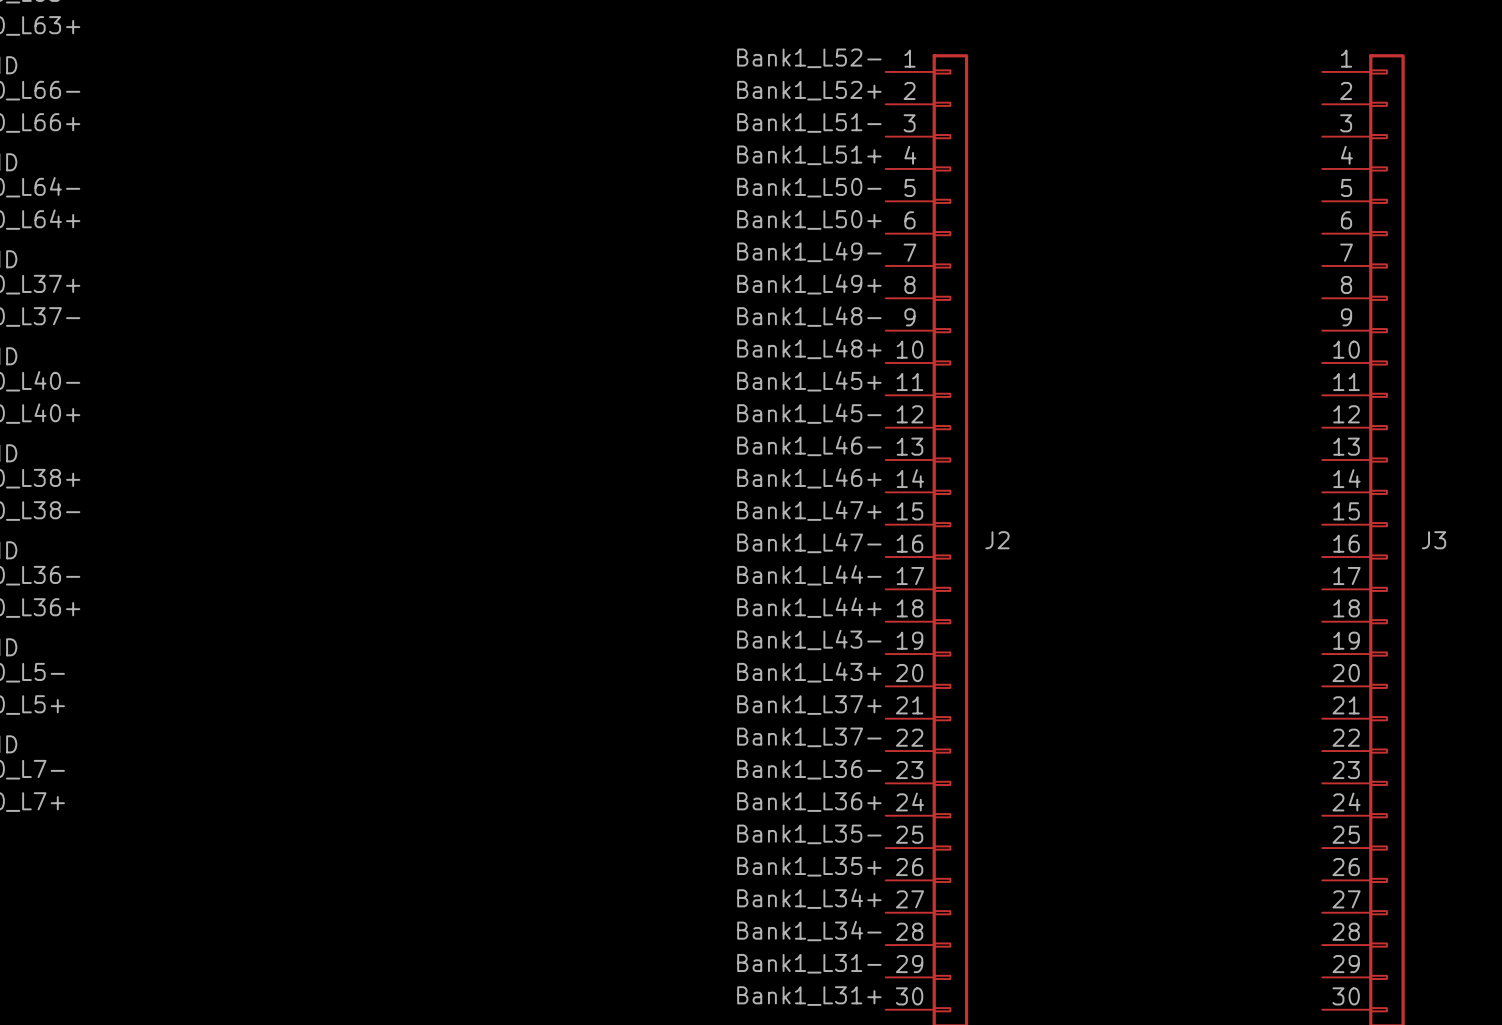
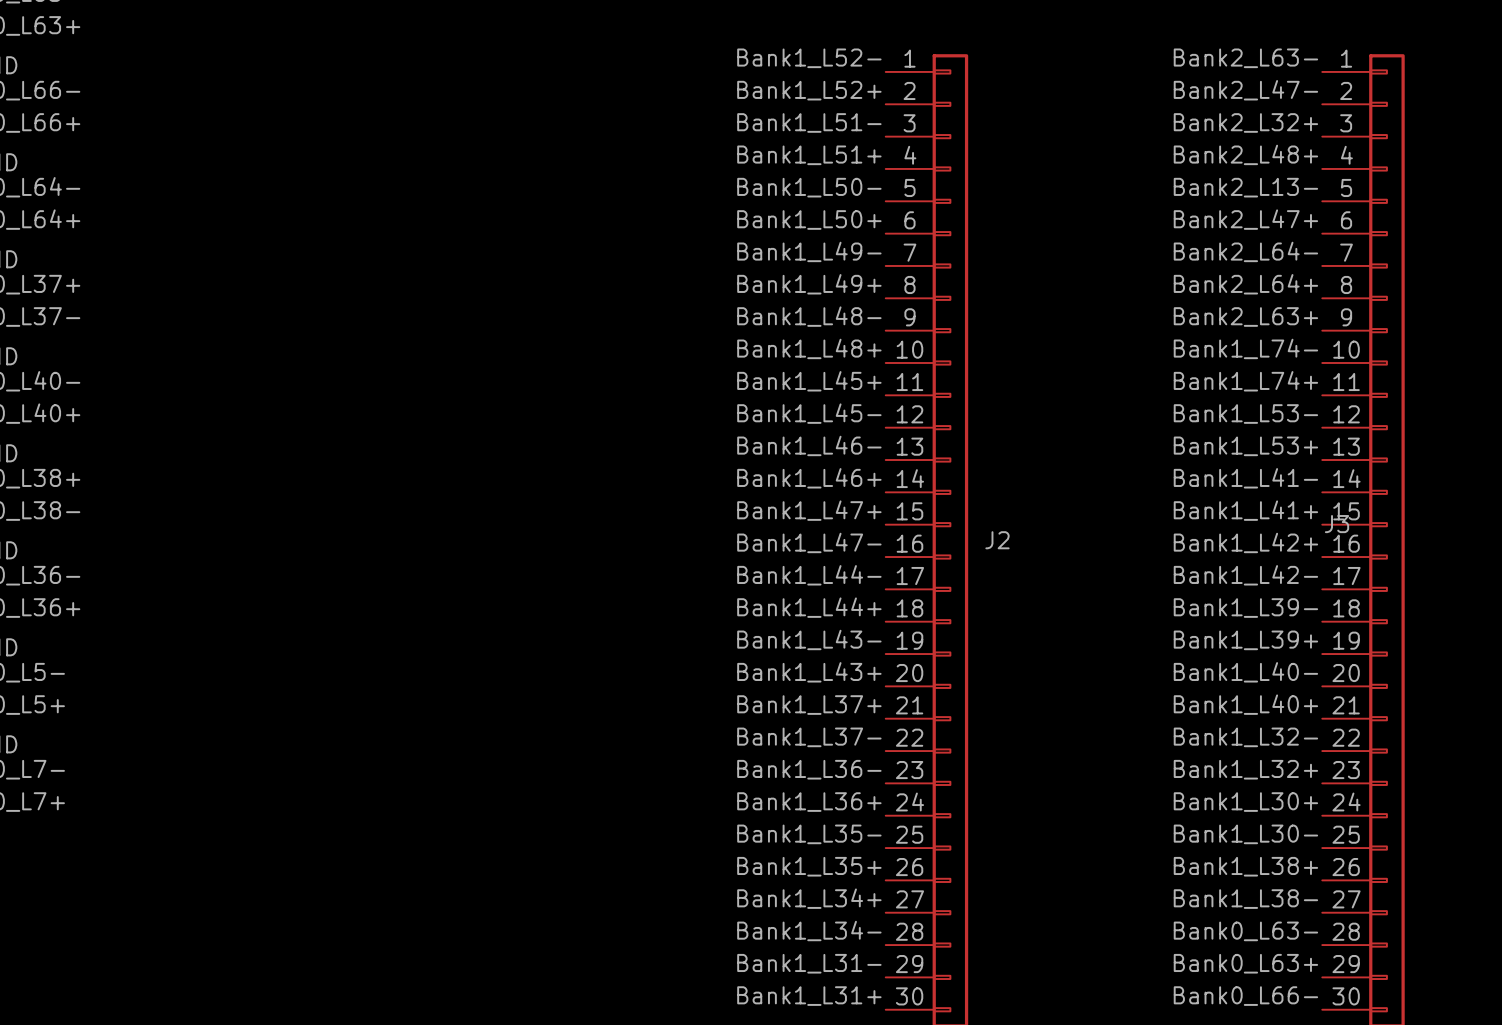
label: none -> Bank2_L63- (1245, 58)
label: none -> Bank2_L47- (1245, 90)
label: none -> Bank2_L32+ (1245, 122)
label: none -> Bank2_L48+ (1245, 154)
label: none -> Bank2_L13- (1245, 187)
label: none -> Bank2_L47+ (1245, 219)
label: none -> Bank2_L64- (1245, 251)
label: none -> Bank2_L64+ (1245, 284)
label: none -> Bank2_L63+ (1245, 317)
label: none -> Bank1_L74- (1245, 348)
label: none -> Bank1_L74+ (1245, 381)
label: none -> Bank1_L53- (1245, 414)
label: none -> Bank1_L53+ (1245, 446)
label: none -> Bank1_L41- (1245, 478)
label: none -> Bank1_L41+ (1245, 510)
J3 name position: J3 (1434, 540) -> J3 (1337, 524)
label: none -> Bank1_L42+ (1245, 542)
label: none -> Bank1_L42- (1245, 575)
label: none -> Bank1_L39- (1245, 608)
label: none -> Bank1_L39+ (1245, 640)
label: none -> Bank1_L40- (1245, 672)
label: none -> Bank1_L40+ (1245, 704)
label: none -> Bank1_L32- (1245, 737)
label: none -> Bank1_L32+ (1245, 769)
label: none -> Bank1_L30+ (1245, 802)
label: none -> Bank1_L30- (1245, 834)
label: none -> Bank1_L38+ (1245, 866)
label: none -> Bank1_L38- (1245, 899)
label: none -> Bank0_L63- (1245, 931)
label: none -> Bank0_L63+ (1245, 963)
label: none -> Bank0_L66- (1245, 996)

